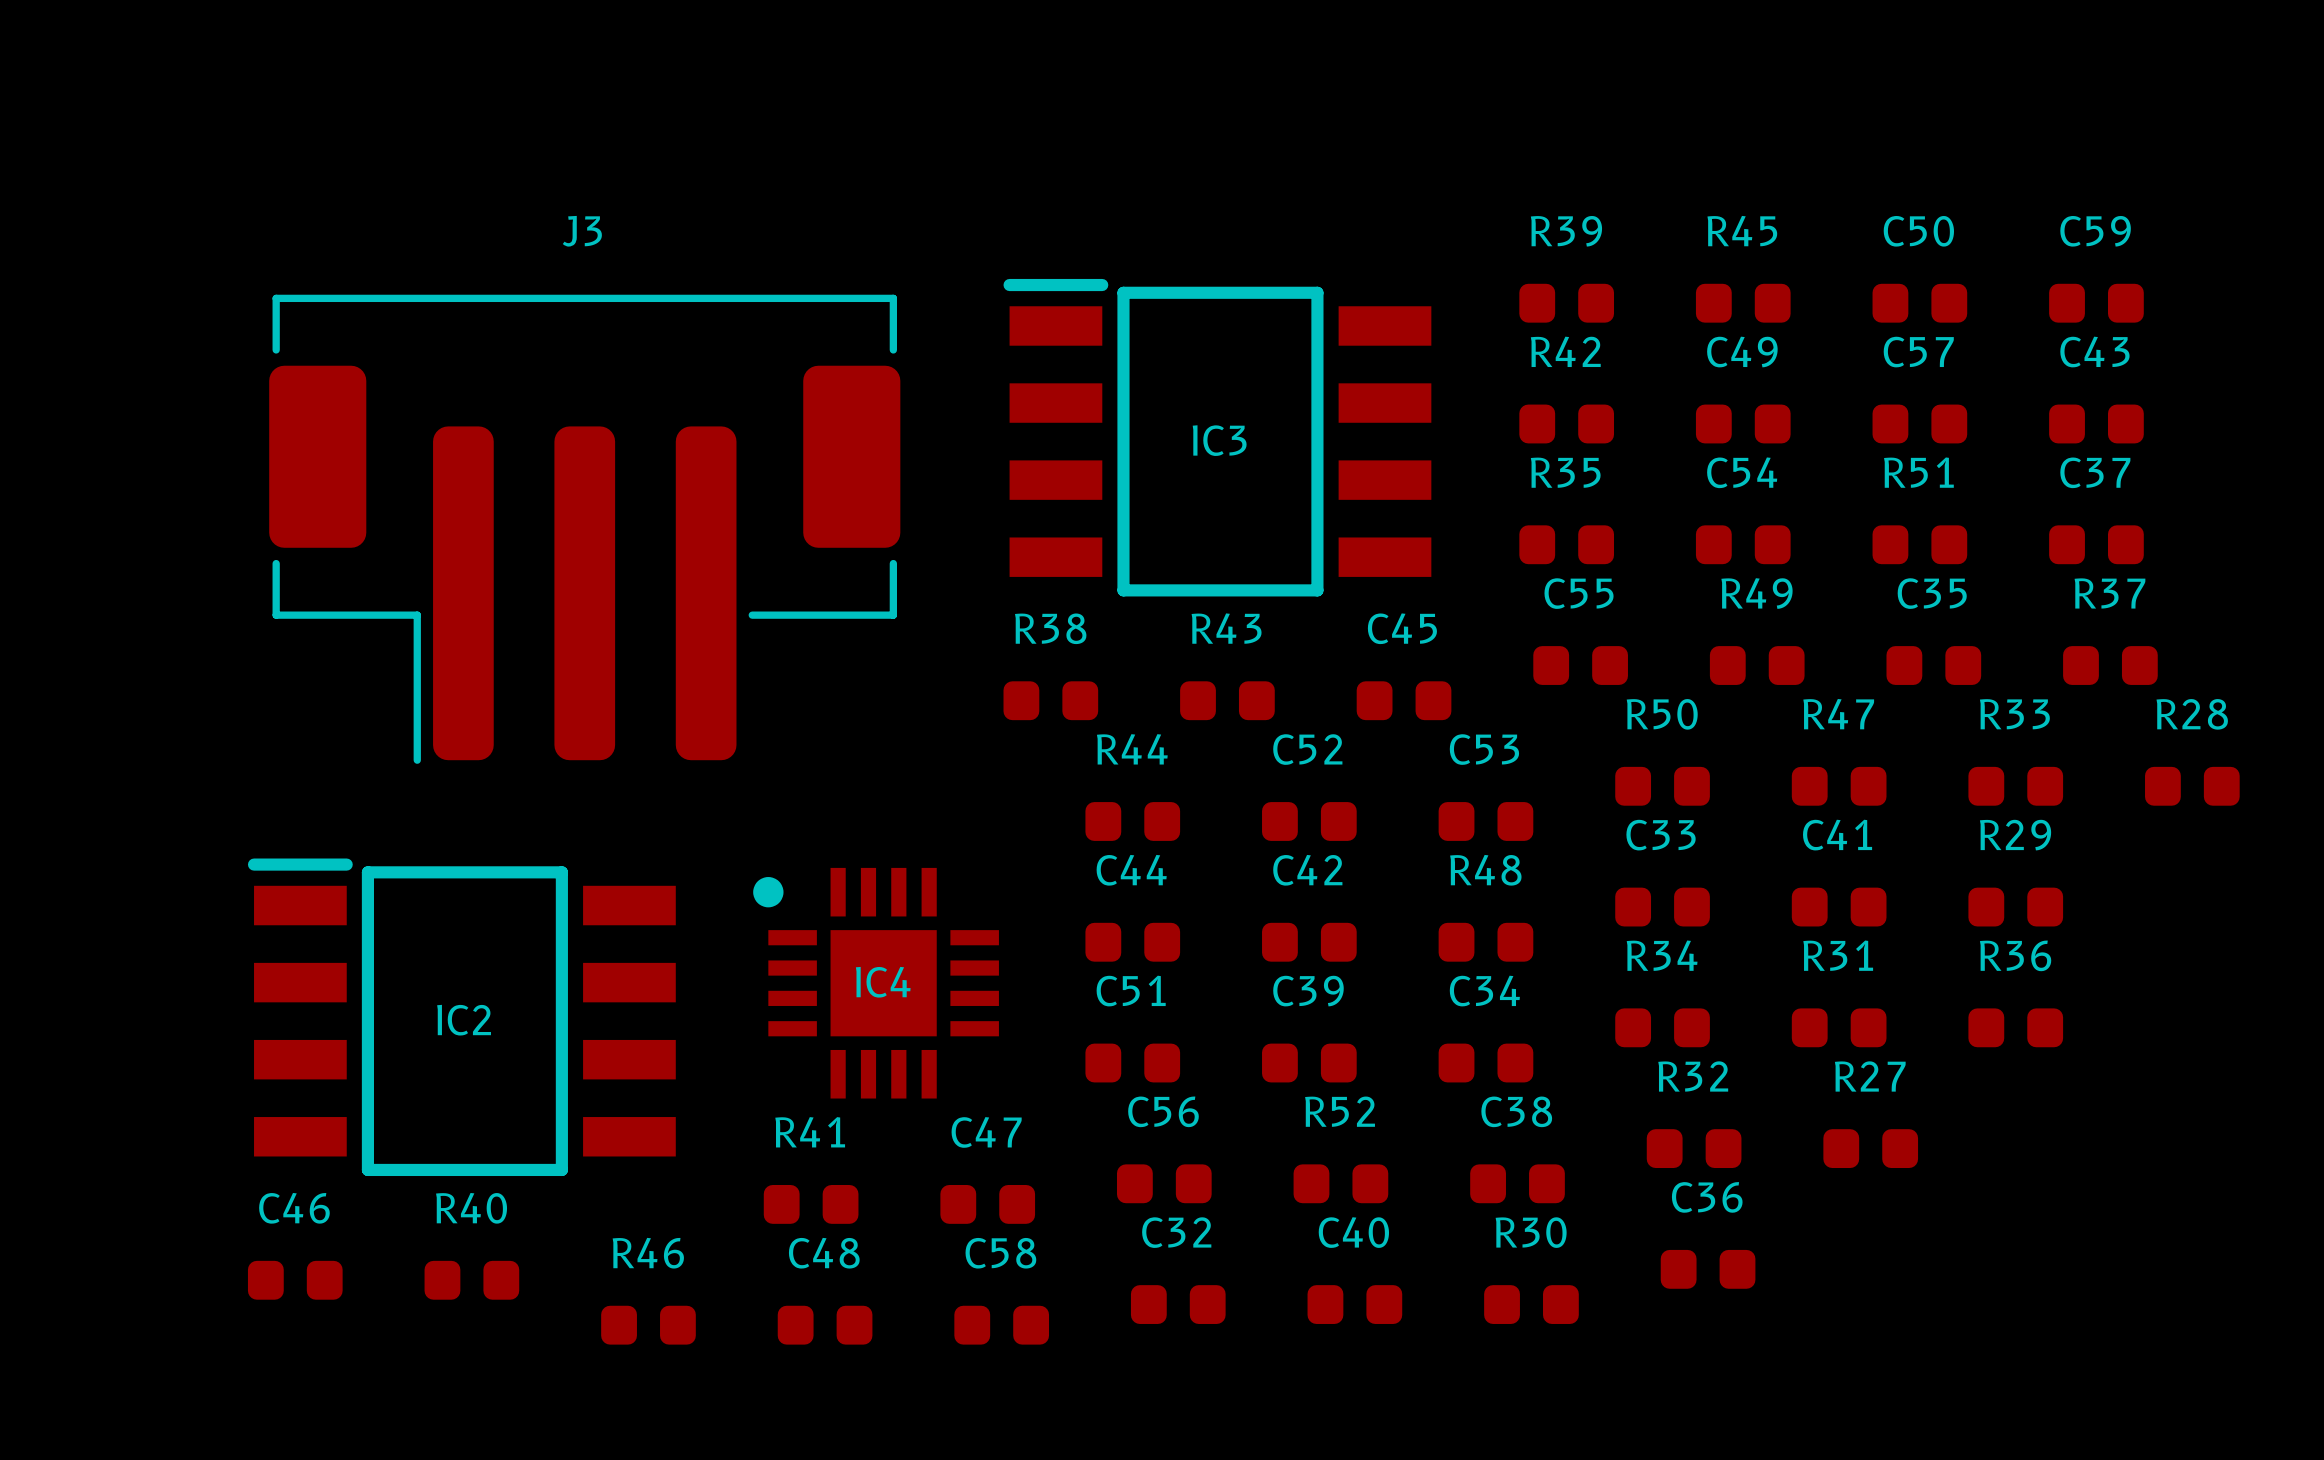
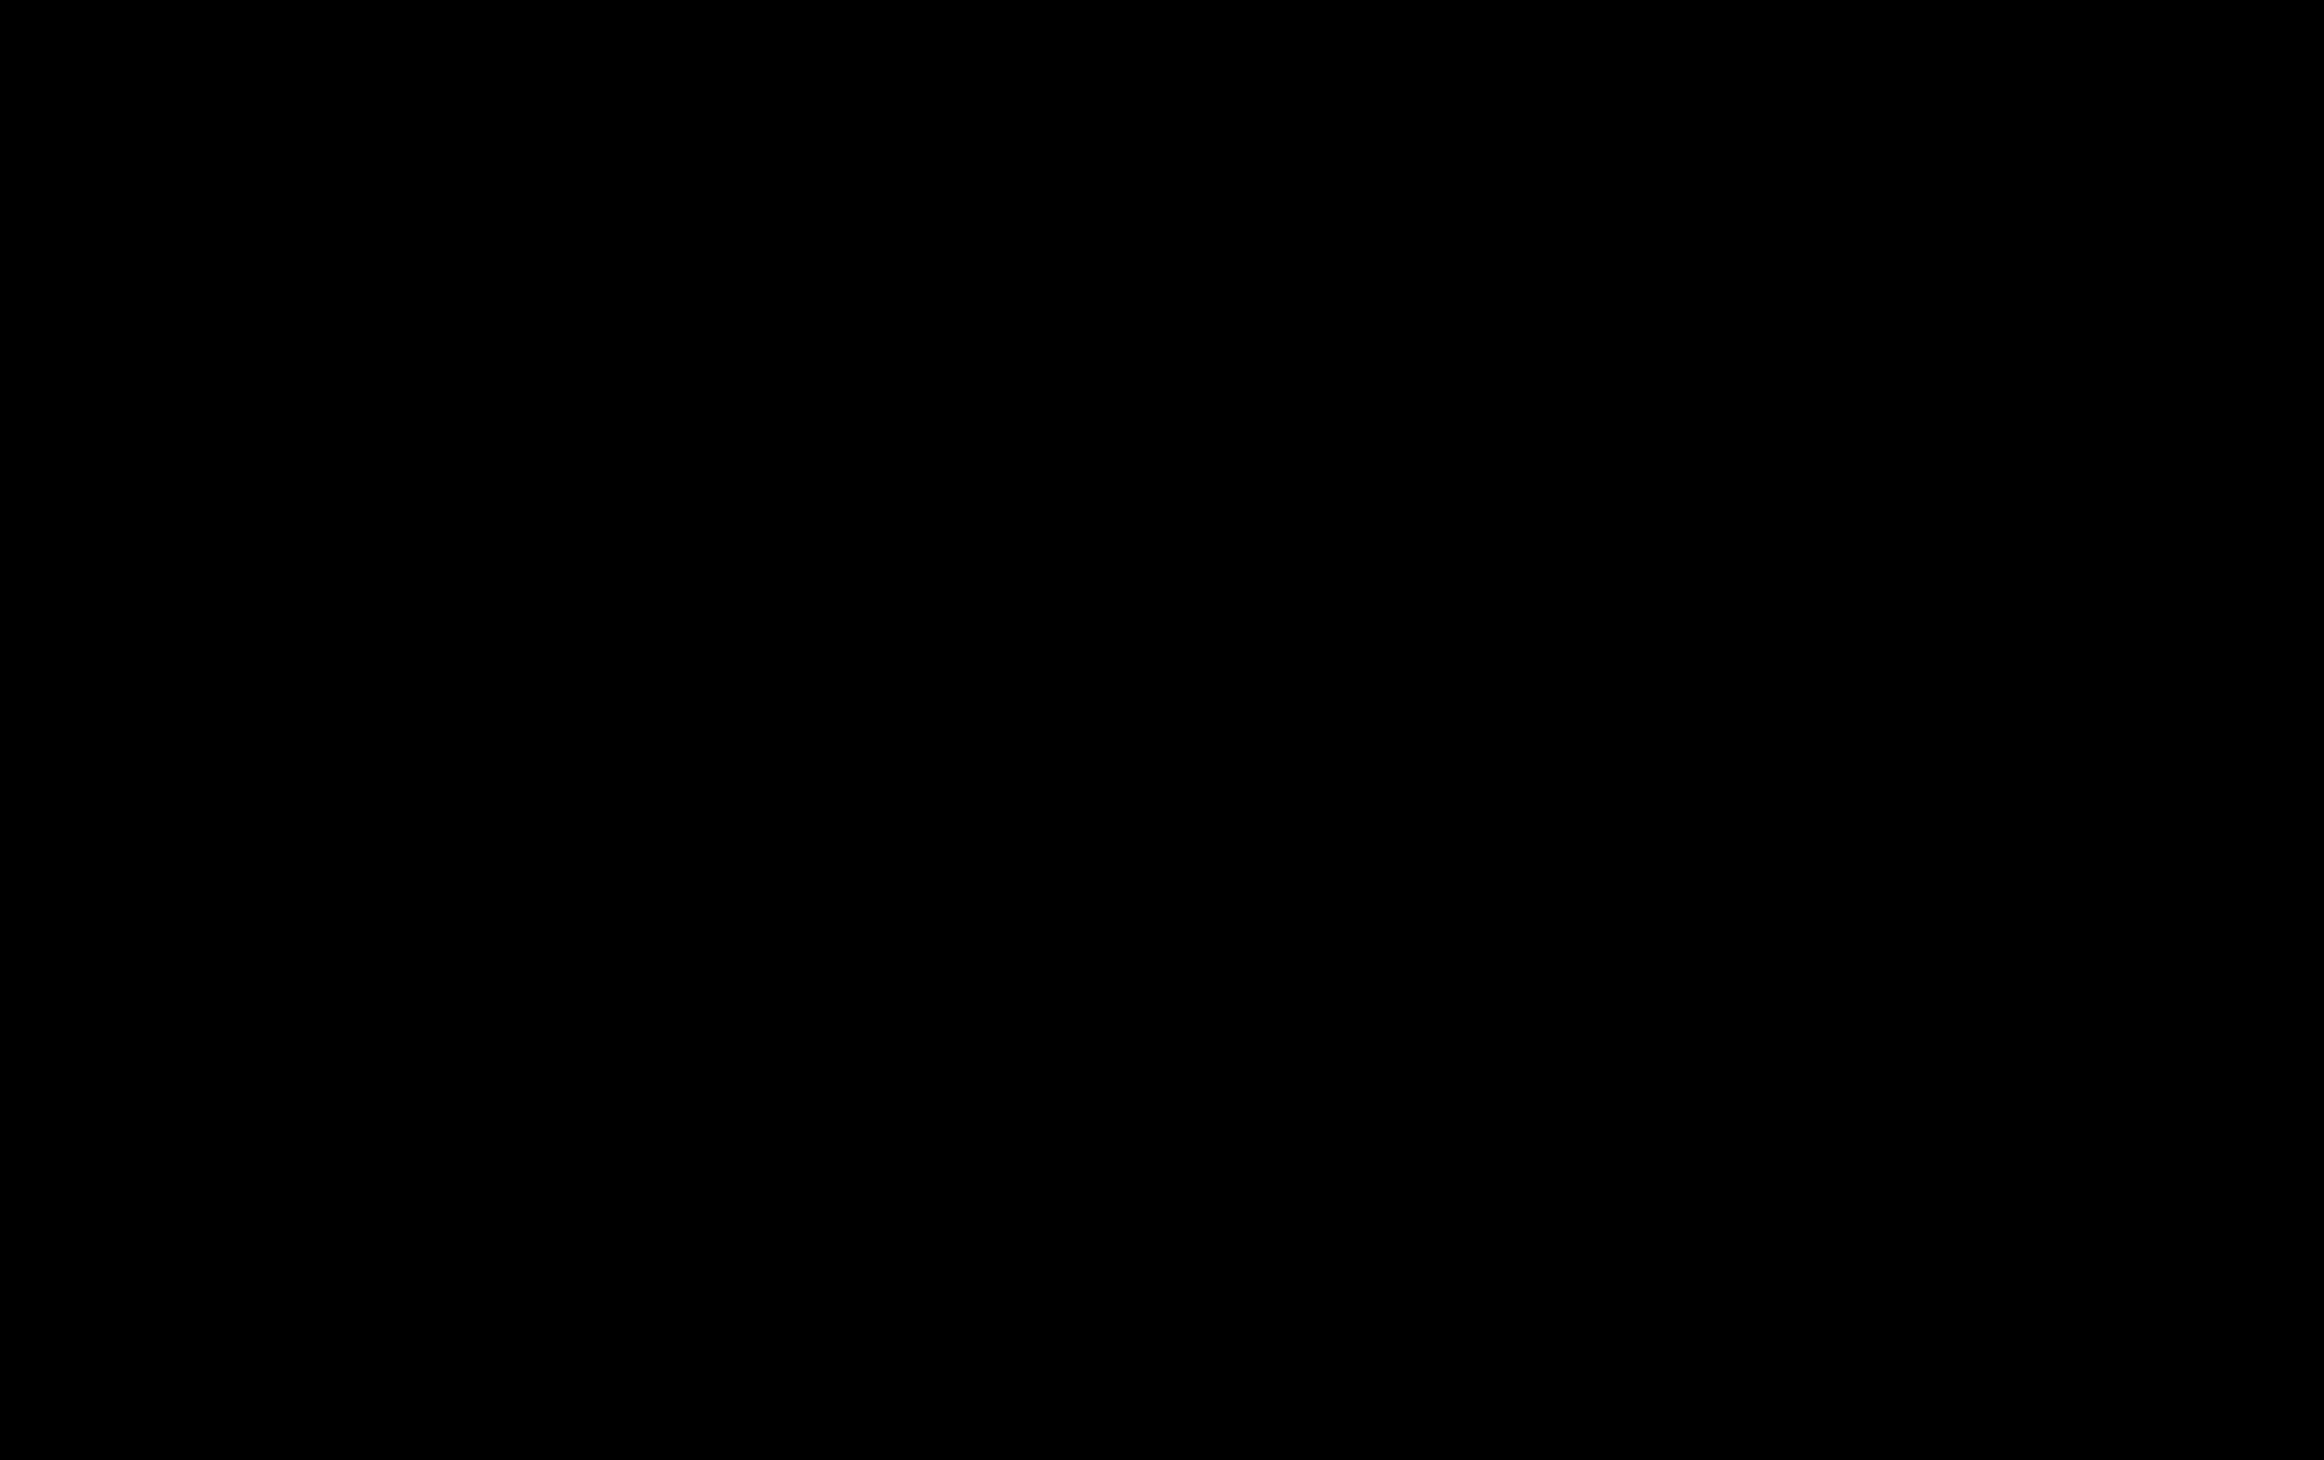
R39: (1566, 303) -> none
R45: (1743, 303) -> none
C50: (1919, 303) -> none
C59: (2096, 303) -> none
R42: (1566, 423) -> none
C49: (1743, 423) -> none
C57: (1919, 423) -> none
C43: (2096, 423) -> none
IC3: (1217, 437) -> none
J3: (584, 529) -> none
R35: (1566, 544) -> none
C54: (1743, 544) -> none
R51: (1919, 544) -> none
C37: (2096, 544) -> none
C55: (1580, 665) -> none
R49: (1757, 665) -> none
C35: (1933, 665) -> none
R37: (2110, 665) -> none
R38: (1050, 700) -> none
R43: (1227, 700) -> none
C45: (1404, 700) -> none
R50: (1662, 786) -> none
R47: (1839, 786) -> none
R33: (2015, 786) -> none
R28: (2192, 786) -> none
R44: (1132, 821) -> none
C52: (1309, 821) -> none
C53: (1485, 821) -> none
C33: (1662, 907) -> none
C41: (1839, 907) -> none
R29: (2015, 907) -> none
C44: (1132, 942) -> none
C42: (1309, 942) -> none
R48: (1485, 942) -> none
IC4: (876, 983) -> none
IC2: (461, 1017) -> none
R34: (1662, 1027) -> none
R31: (1839, 1027) -> none
R36: (2015, 1027) -> none
C51: (1132, 1063) -> none
C39: (1309, 1063) -> none
C34: (1485, 1063) -> none
R32: (1694, 1148) -> none
R27: (1870, 1148) -> none
C56: (1164, 1183) -> none
R52: (1340, 1183) -> none
C38: (1517, 1183) -> none
R41: (811, 1204) -> none
C47: (987, 1204) -> none
C36: (1708, 1269) -> none
C46: (295, 1280) -> none
R40: (471, 1280) -> none
C32: (1178, 1304) -> none
C40: (1354, 1304) -> none
R30: (1531, 1304) -> none
R46: (648, 1325) -> none
C48: (825, 1325) -> none
C58: (1001, 1325) -> none

